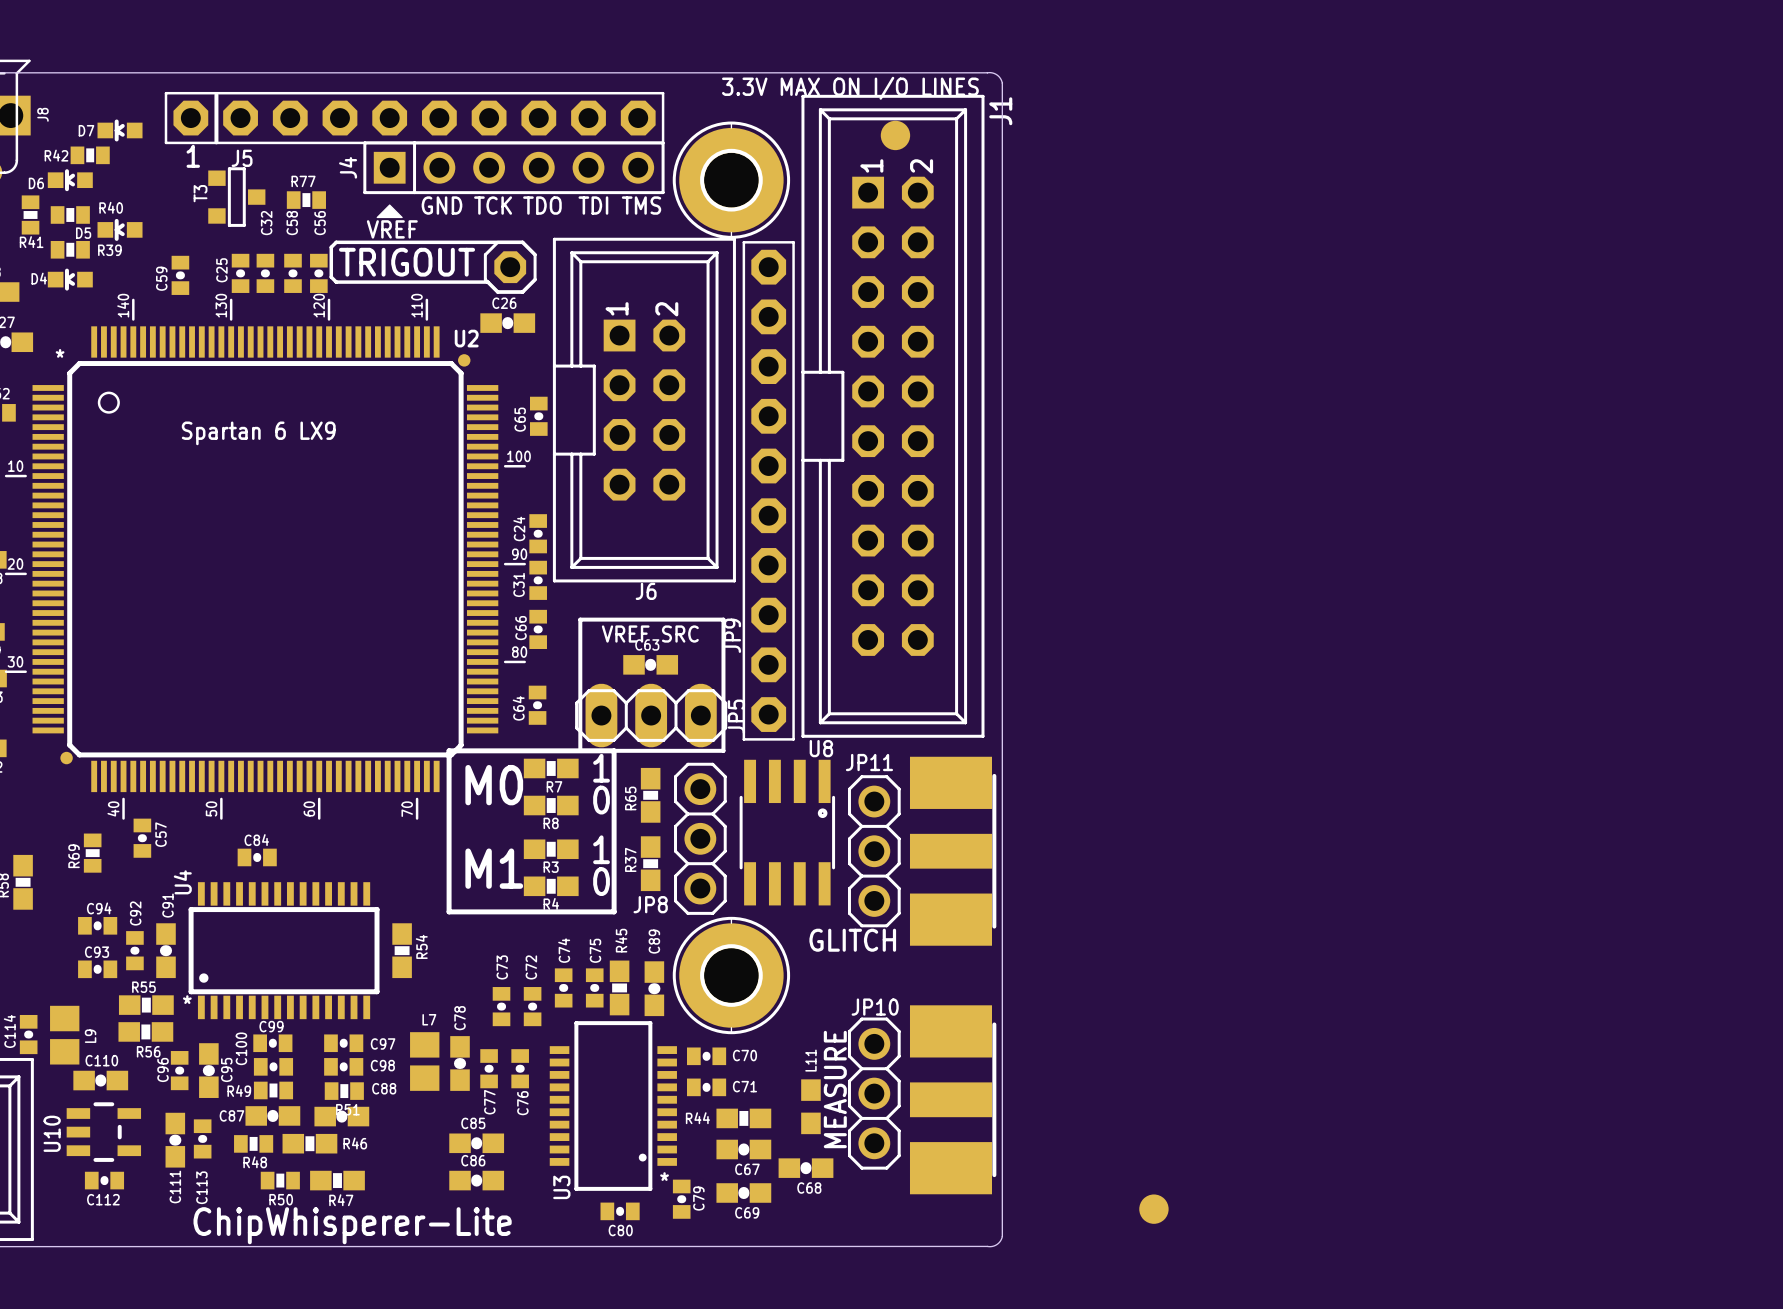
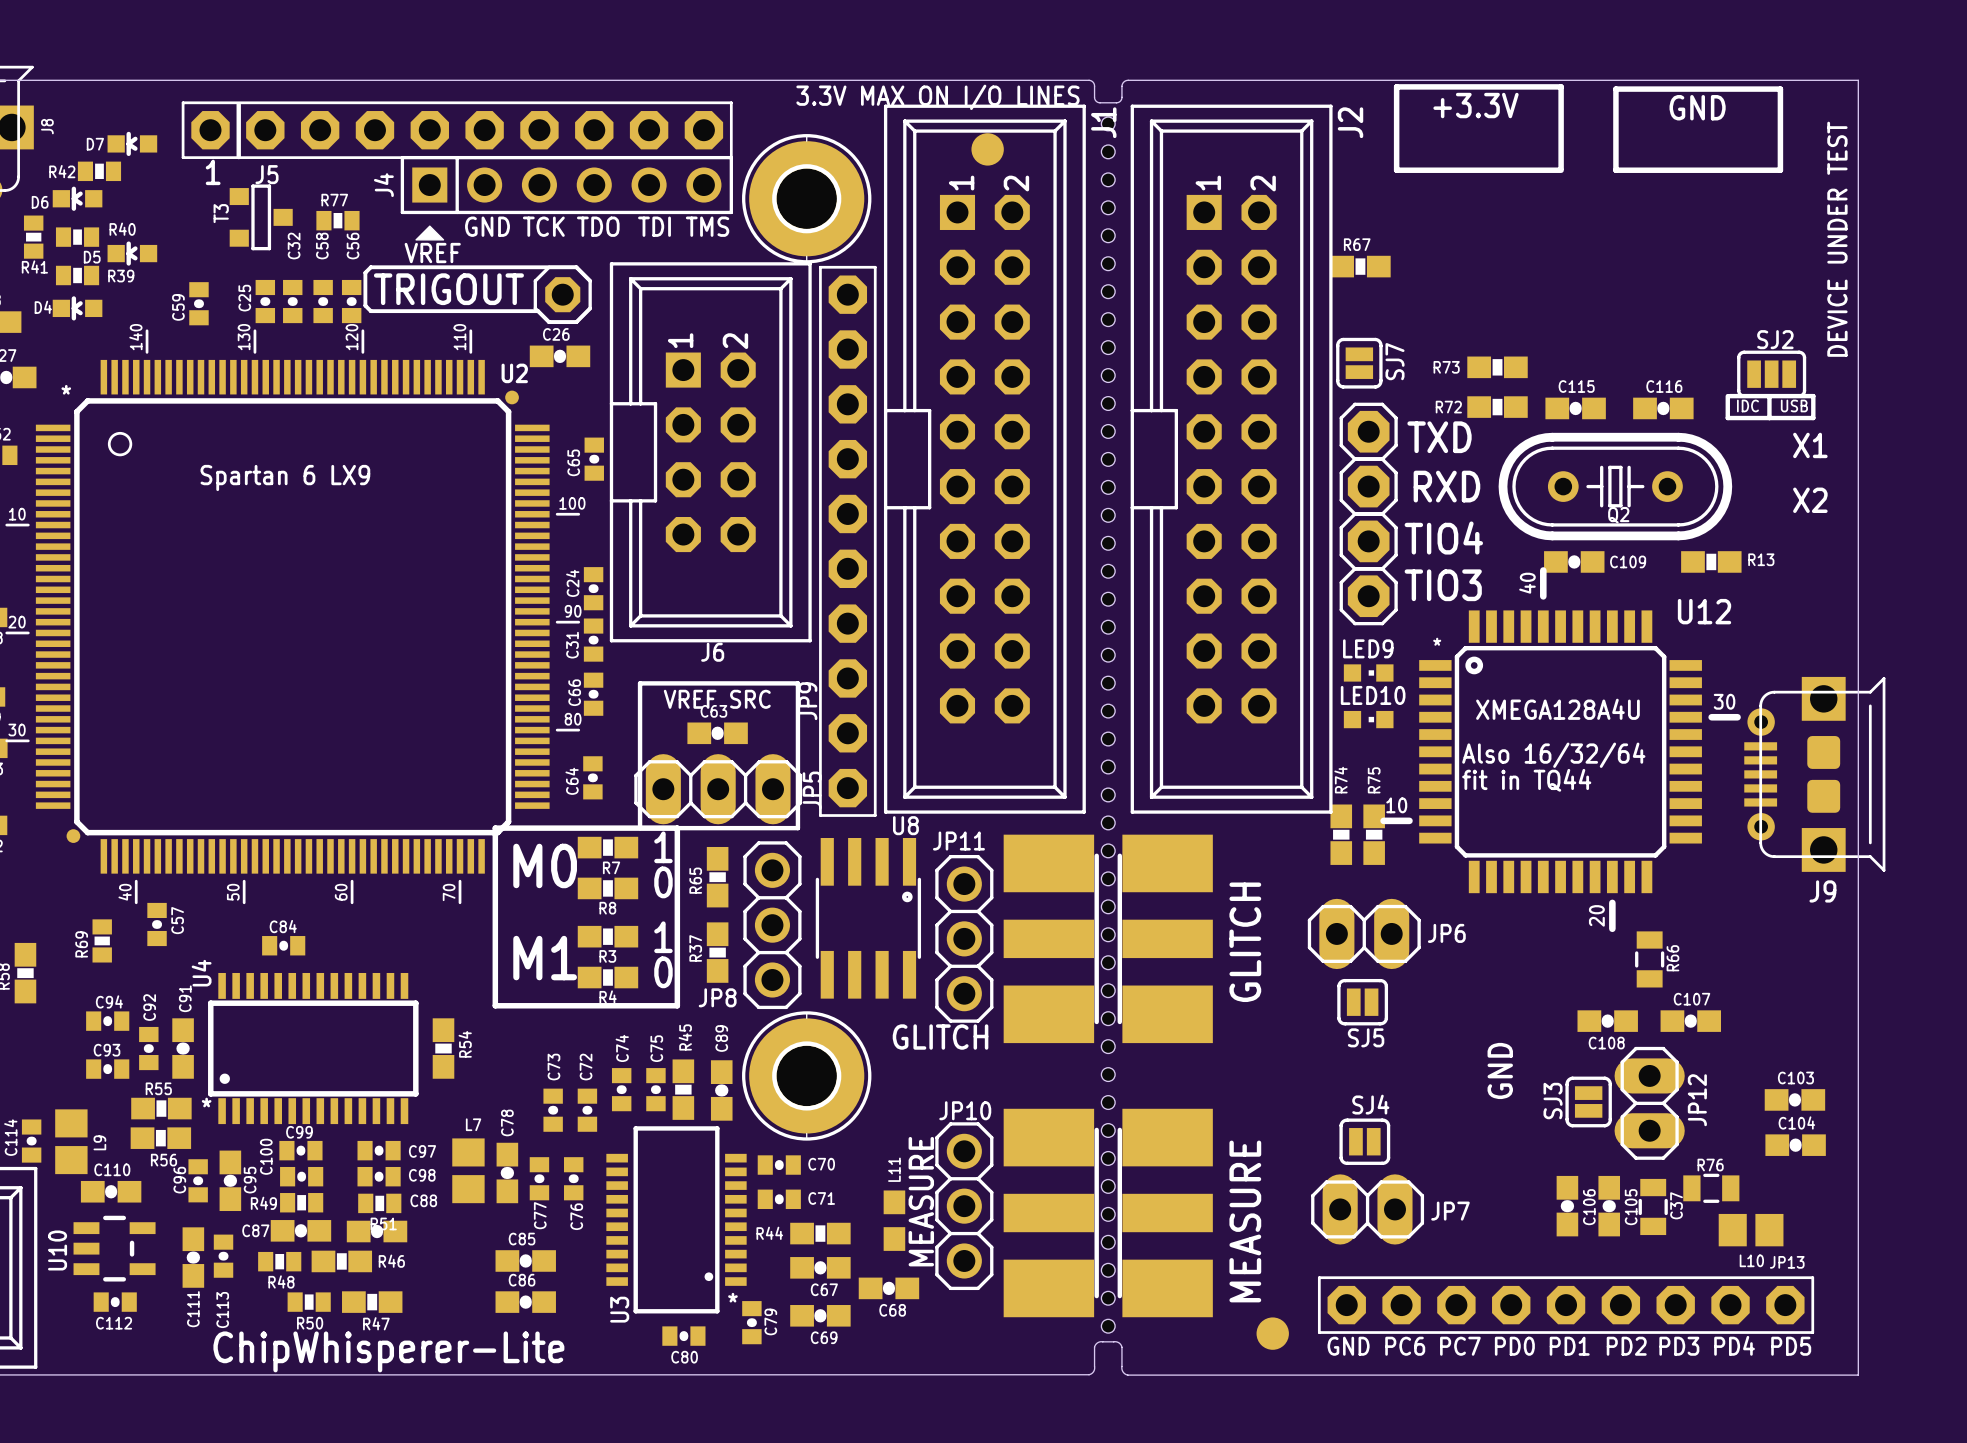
board edge: (987, 72) (997, 74) (1002, 83) (1002, 1236) (996, 1244) (987, 1246) -> (1089, 80) (1094, 84) (1094, 99) (1100, 102) (1119, 101) (1121, 98) (1122, 83) (1128, 80) (1858, 80) (1858, 1375) (1127, 1375) (1121, 1369) (1121, 1346) (1115, 1341) (1100, 1341) (1096, 1344) (1094, 1369) (1089, 1374)
line: none -> (1615, 89) (1780, 89) (1780, 170) (1615, 170) (1615, 89)
text: none -> +3.3V (1476, 105)
text: none -> GND (1697, 107)
hole: none -> (1108, 123)
hole: none -> (1108, 151)
line: none -> (1561, 168) (1561, 86) (1396, 86) (1396, 170) (1561, 170)
hole: none -> (1108, 179)
hole: none -> (1108, 207)
hole: none -> (1108, 235)
text: none -> DEVICE UNDER TEST (1837, 239)
hole: none -> (1108, 263)
R67: none -> (1360, 266)
hole: none -> (1108, 291)
hole: none -> (1108, 319)
hole: none -> (1108, 347)
SJ7: none -> (1359, 363)
R73: none -> (1497, 367)
SJ2: none -> (1771, 374)
hole: none -> (1108, 375)
line: none -> (1727, 396) (1727, 418) (1813, 418) (1813, 396) (1729, 396)
line: none -> (1769, 398) (1769, 418)
hole: none -> (1108, 403)
text: none -> IDC (1747, 405)
text: none -> USB (1794, 405)
R72: none -> (1497, 407)
C115: none -> (1575, 408)
C116: none -> (1663, 408)
hole: none -> (1108, 431)
part: none -> (1368, 431)
text: none -> TXD (1439, 437)
text: none -> X1 (1810, 445)
hole: none -> (1108, 459)
J2: none -> (1231, 459)
hole: none -> (1108, 487)
part: none -> (1368, 486)
text: none -> RXD (1446, 486)
Q2: none -> (1615, 486)
text: none -> X2 (1810, 500)
hole: none -> (1108, 515)
text: none -> TIO4 (1443, 538)
part: none -> (1368, 541)
hole: none -> (1108, 543)
C109: none -> (1574, 561)
R13: none -> (1711, 561)
hole: none -> (1108, 571)
text: none -> TIO3 (1443, 585)
part: none -> (1368, 596)
hole: none -> (1108, 599)
hole: none -> (1108, 627)
hole: none -> (1108, 655)
LED9: none -> (1368, 672)
hole: none -> (1108, 683)
text: none -> XMEGA128A4U (1557, 709)
hole: none -> (1108, 711)
LED10: none -> (1368, 719)
hole: none -> (1108, 739)
U12: none -> (1560, 749)
text: none -> Also 16/32/64 (1553, 755)
hole: none -> (1108, 767)
J9: none -> (1814, 774)
text: none -> fit in TQ44 (1526, 780)
hole: none -> (1108, 794)
hole: none -> (1108, 822)
R74: none -> (1341, 834)
R75: none -> (1374, 834)
hole: none -> (1108, 850)
hole: none -> (1108, 878)
hole: none -> (1108, 906)
JP6: none -> (1364, 933)
hole: none -> (1108, 934)
part: none -> (1165, 938)
text: none -> GLITCH (1245, 942)
R66: none -> (1649, 959)
hole: none -> (1108, 962)
hole: none -> (1108, 990)
SJ5: none -> (1362, 1002)
hole: none -> (1108, 1018)
C108: none -> (1607, 1021)
C107: none -> (1690, 1021)
hole: none -> (1108, 1046)
text: none -> GND (1500, 1070)
hole: none -> (1108, 1074)
C103: none -> (1794, 1099)
hole: none -> (1108, 1102)
SJ3: none -> (1588, 1101)
JP12: none -> (1649, 1103)
hole: none -> (1108, 1130)
SJ4: none -> (1364, 1141)
C104: none -> (1795, 1145)
hole: none -> (1108, 1158)
hole: none -> (1108, 1186)
R76: none -> (1711, 1188)
C106: none -> (1567, 1206)
C105: none -> (1609, 1206)
C37: none -> (1653, 1206)
JP7: none -> (1367, 1209)
part: none -> (1165, 1213)
hole: none -> (1108, 1214)
text: none -> MEASURE (1245, 1221)
L10: none -> (1751, 1230)
hole: none -> (1108, 1242)
hole: none -> (1108, 1270)
hole: none -> (1108, 1298)
JP13: none -> (1566, 1305)
hole: none -> (1108, 1326)
text: none -> GND (1348, 1346)
text: none -> PC6 (1405, 1346)
text: none -> PC7 (1460, 1346)
text: none -> PD0 (1514, 1346)
text: none -> PD1 (1569, 1346)
text: none -> PD2 (1626, 1346)
text: none -> PD3 (1679, 1346)
text: none -> PD4 (1734, 1345)
text: none -> PD5 (1791, 1346)

